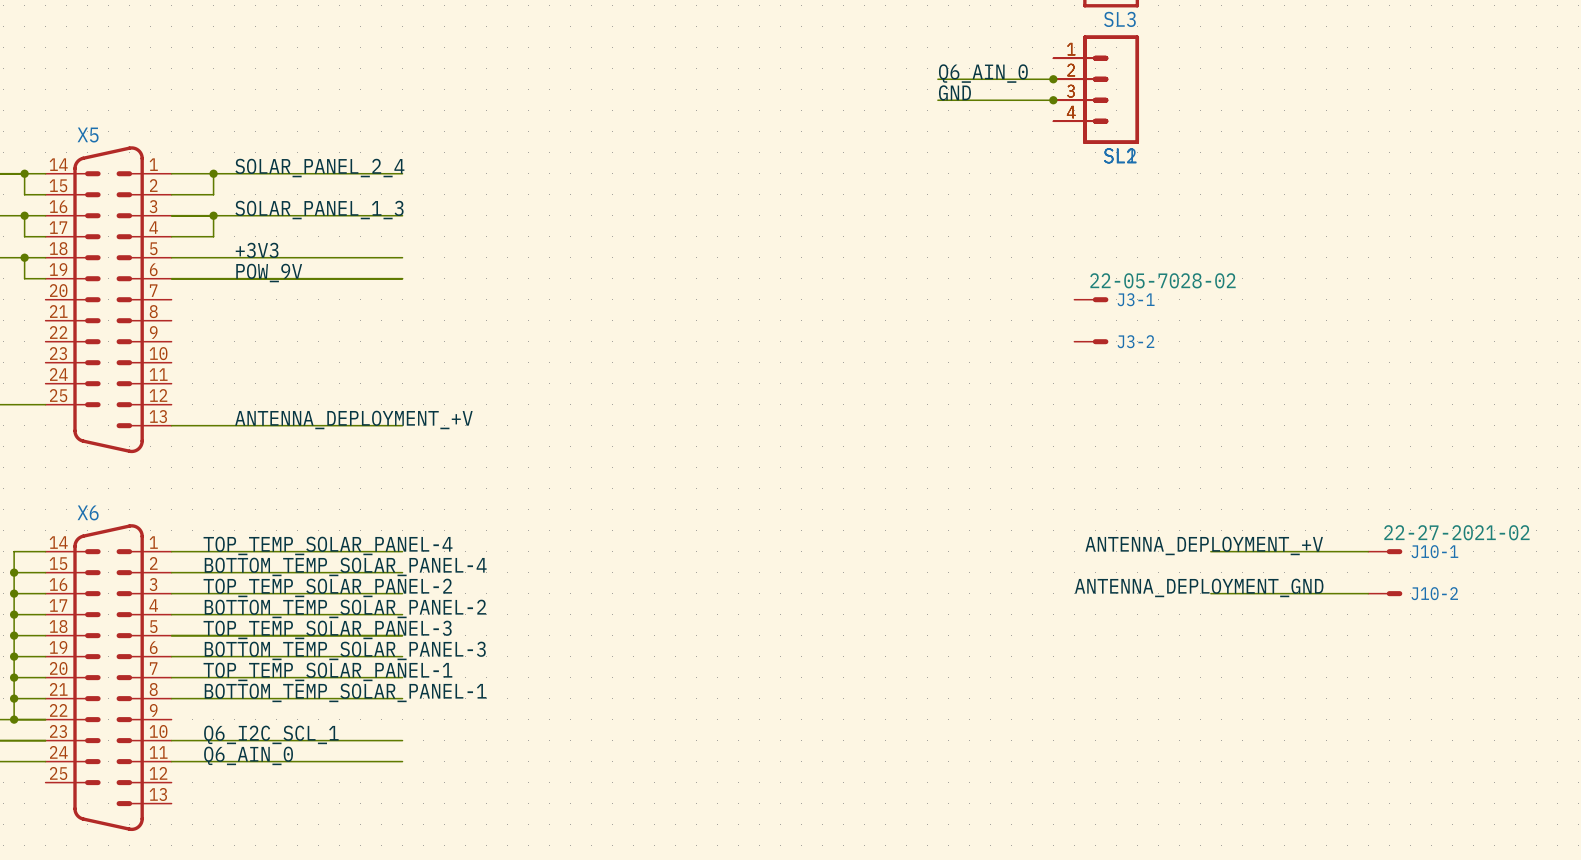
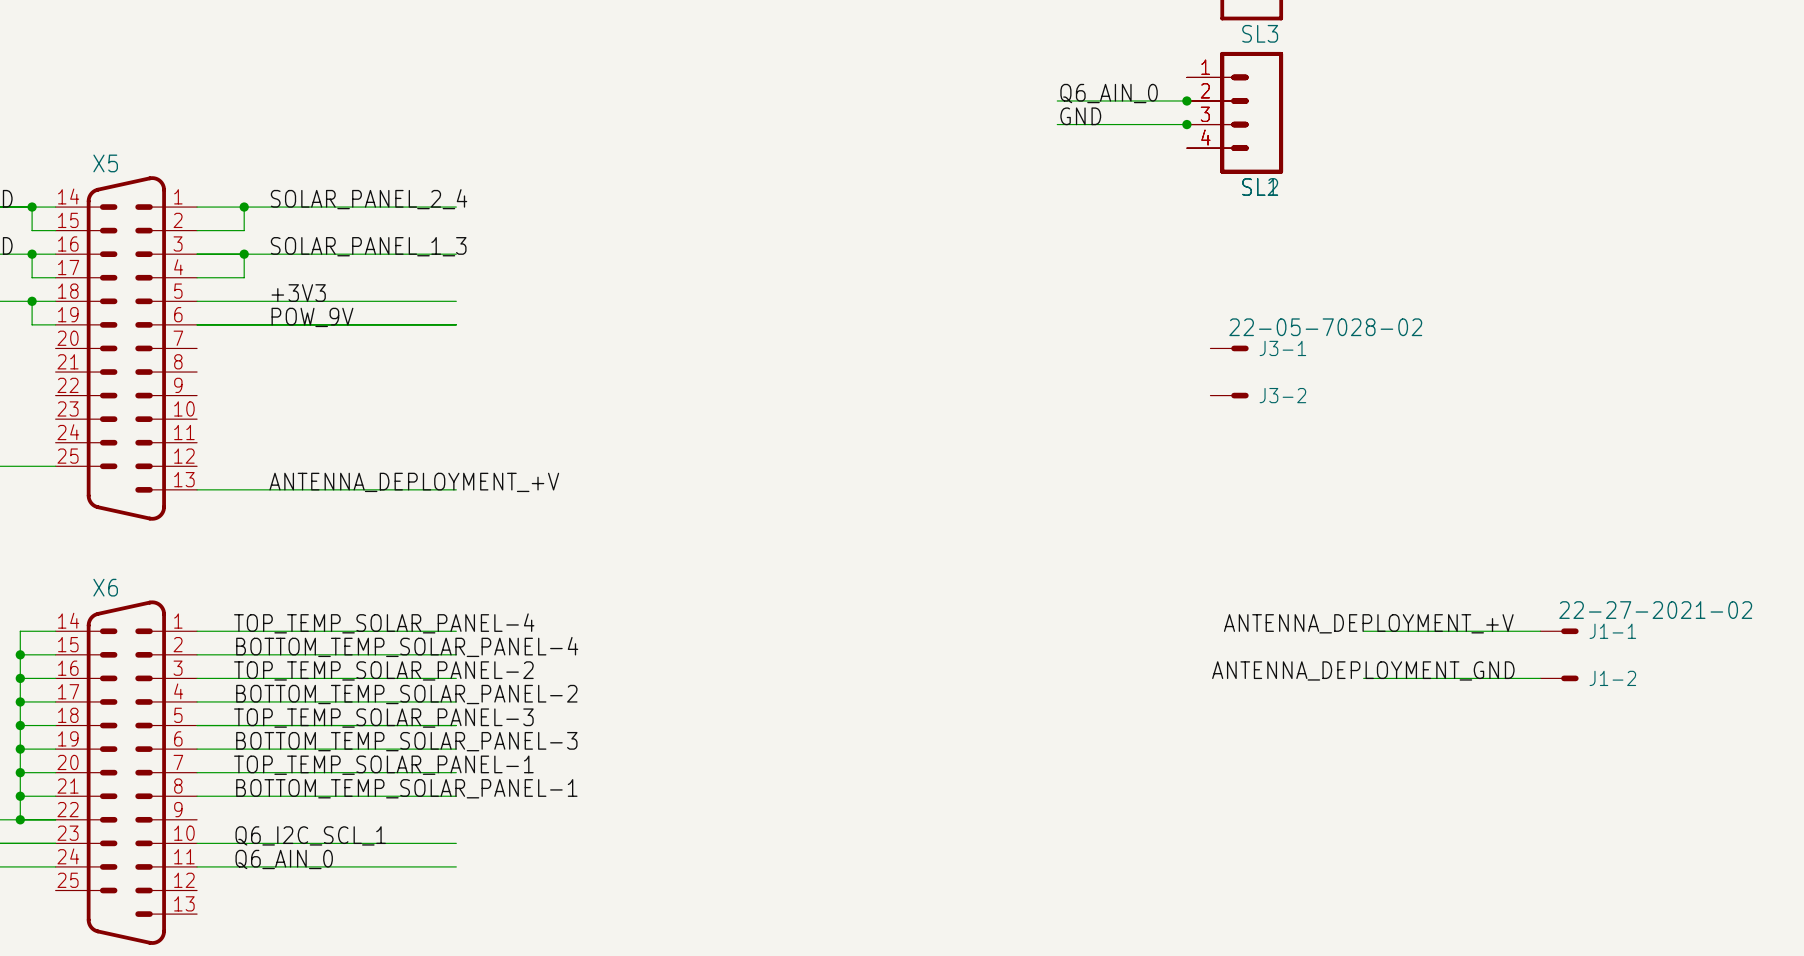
J10-1 name: J10-1 (1434, 551) -> J1-1 (1612, 631)
J10-2 name: J10-2 (1434, 593) -> J1-2 (1612, 678)

